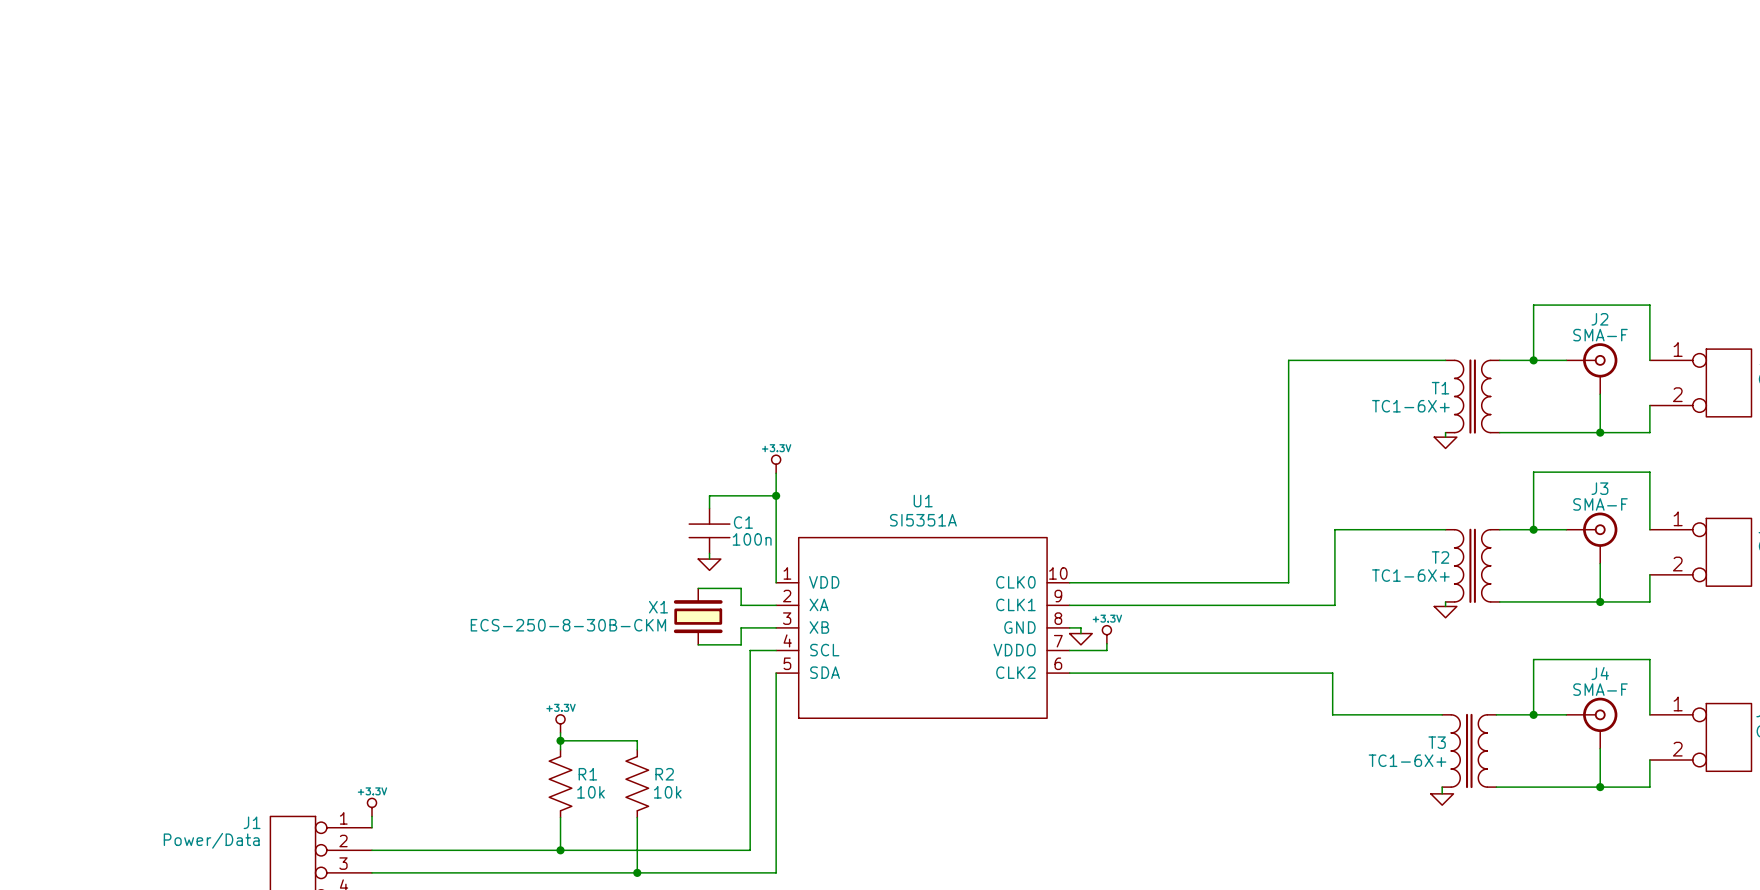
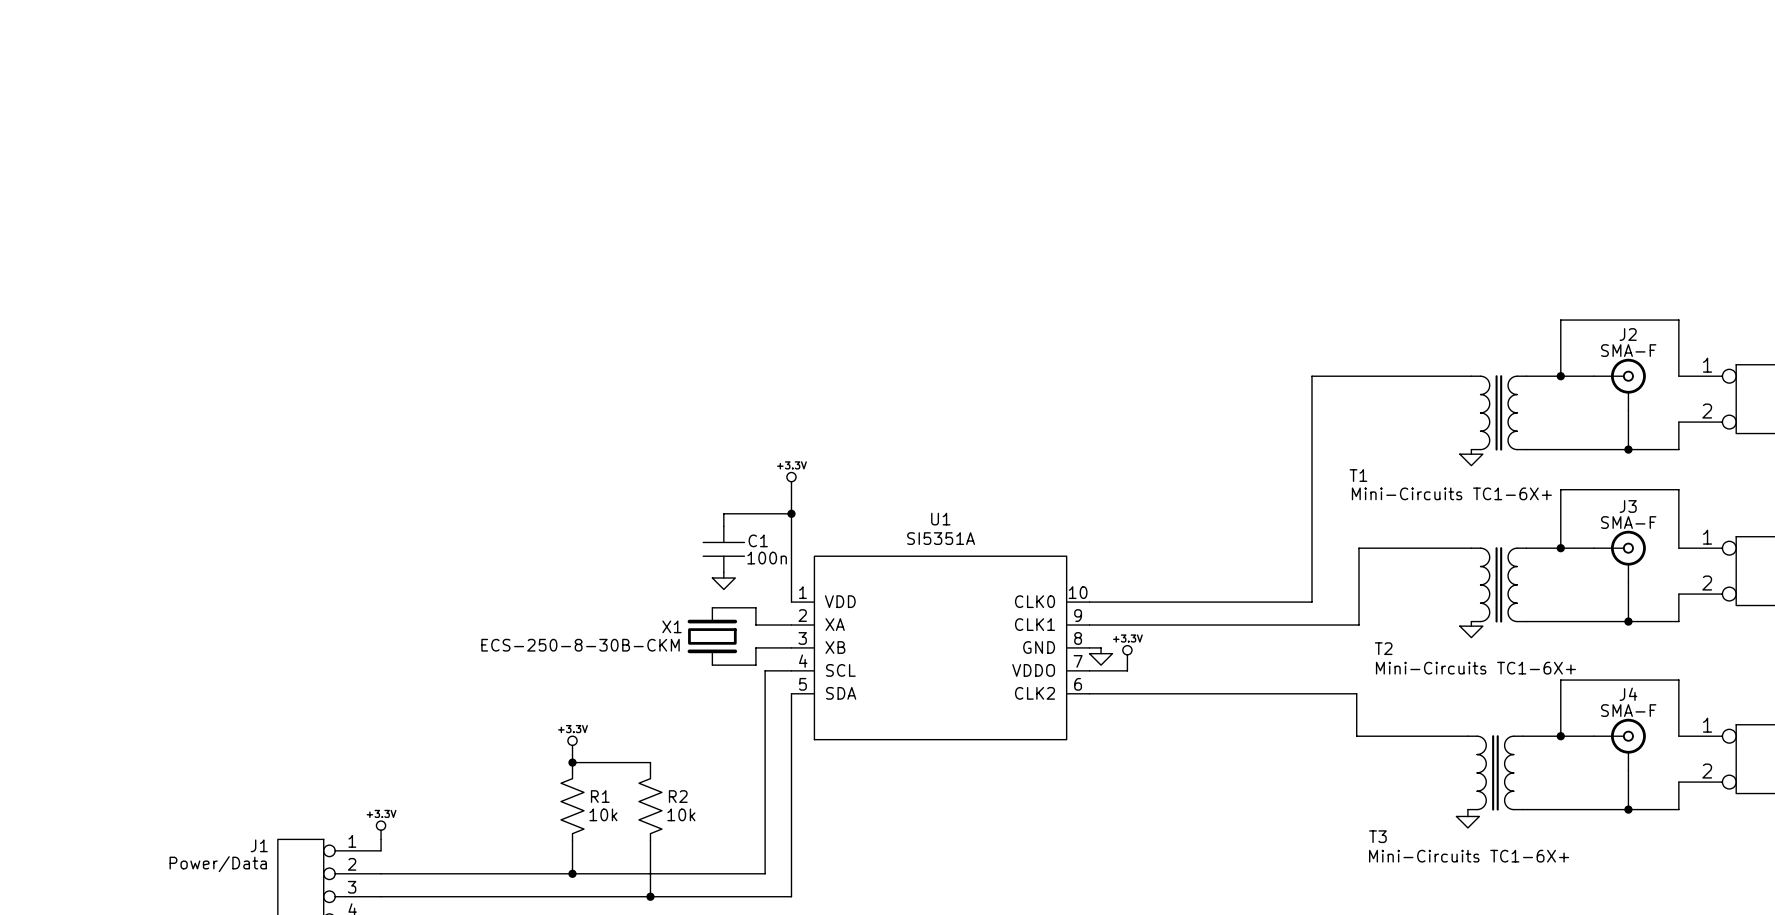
T1 name position: T1 (1440, 388) -> T1 (1358, 475)
T1 value: TC1-6X+ (1410, 406) -> Mini-Circuits TC1-6X+ (1451, 493)
T2 name position: T2 (1440, 557) -> T2 (1383, 648)
T2 value: TC1-6X+ (1410, 575) -> Mini-Circuits TC1-6X+ (1475, 668)
T3 name position: T3 (1437, 742) -> T3 (1377, 836)
T3 value: TC1-6X+ (1407, 760) -> Mini-Circuits TC1-6X+ (1469, 856)

